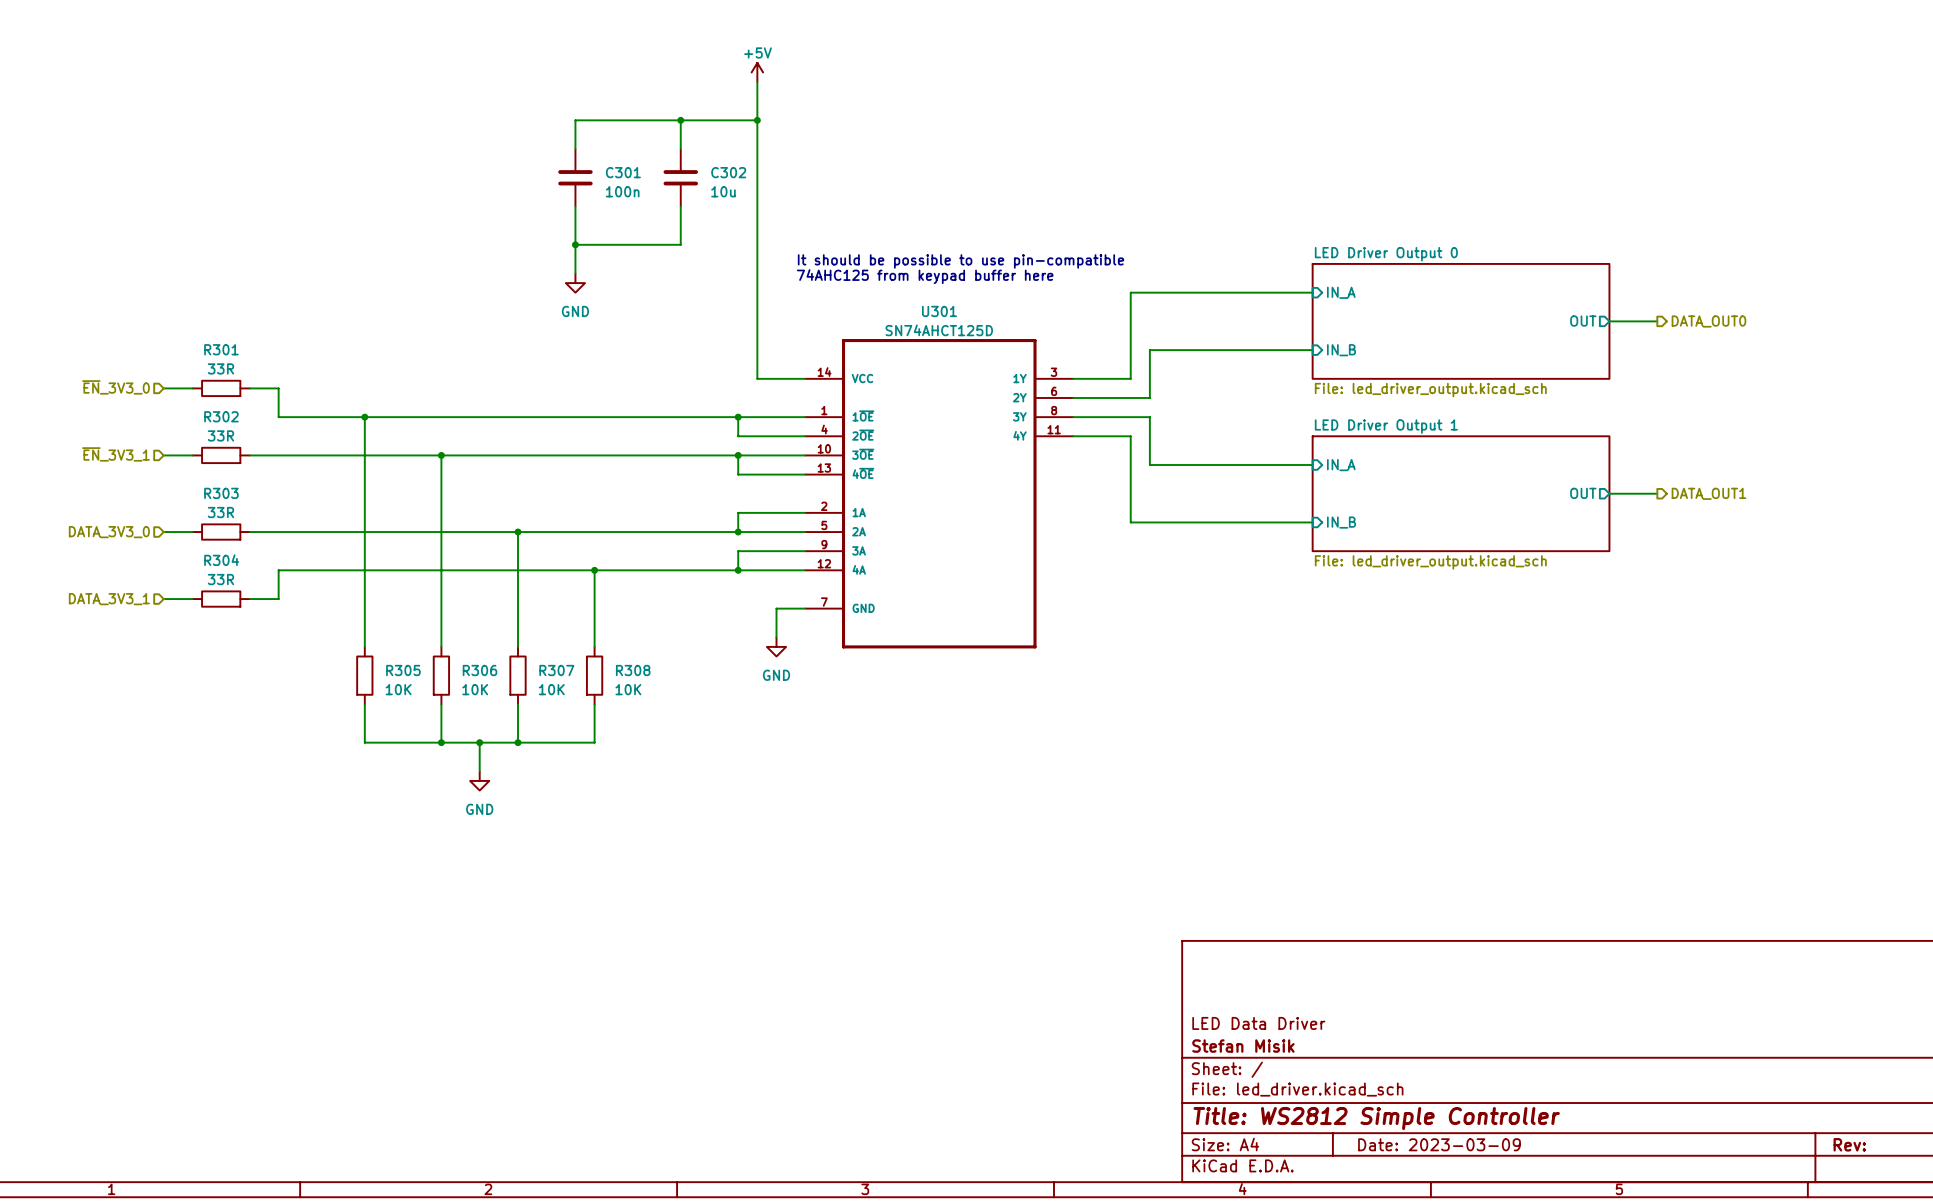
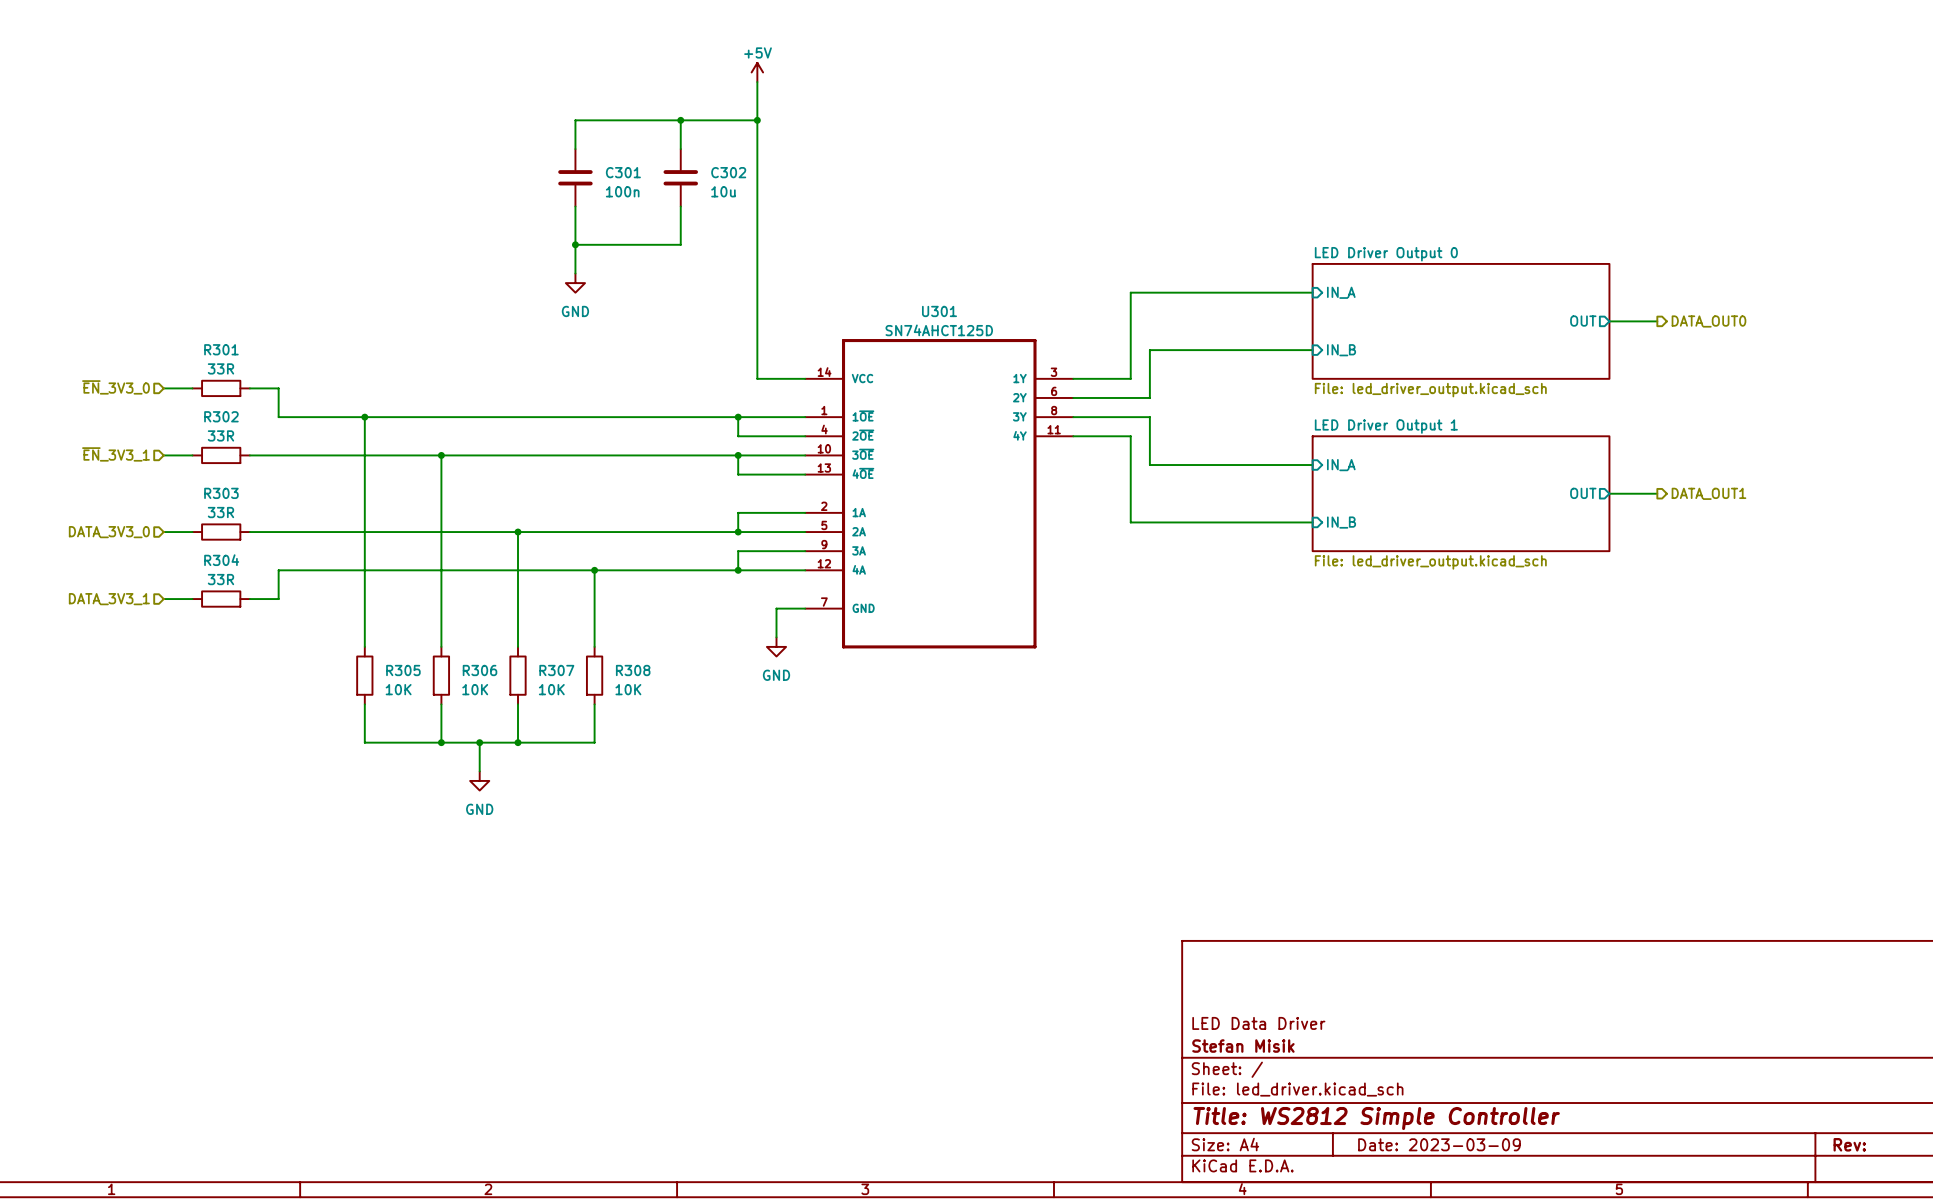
text: It should be possible to use pin-compatible (960, 261) -> none
text: 74AHC125 from keypad buffer here (925, 276) -> none

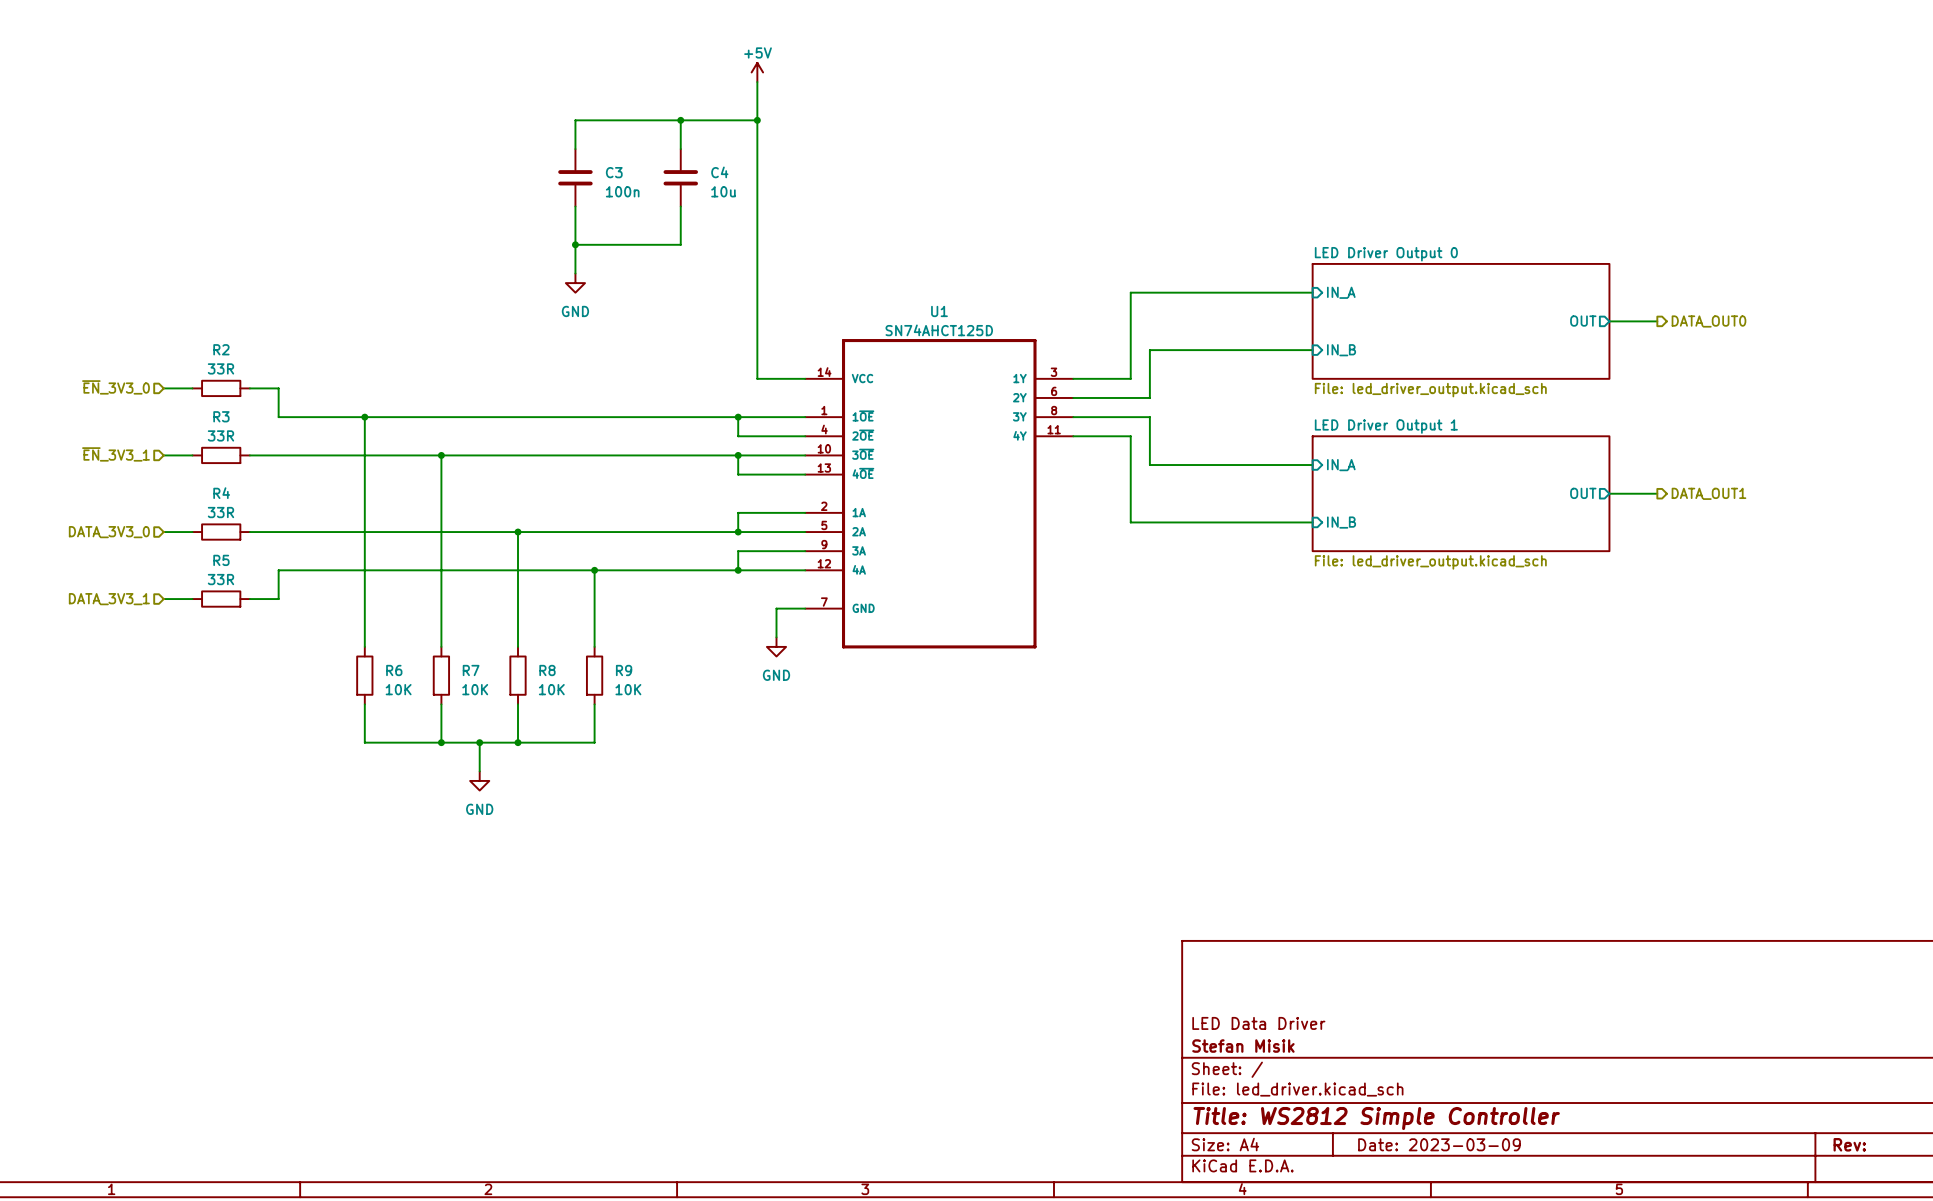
C301 name: C301 (623, 172) -> C3 (614, 172)
C302 name: C302 (728, 172) -> C4 (719, 172)
U301 name: U301 (939, 311) -> U1 (939, 311)
R301 name: R301 (221, 349) -> R2 (221, 349)
R302 name: R302 (221, 416) -> R3 (221, 416)
R303 name: R303 (221, 493) -> R4 (221, 493)
R304 name: R304 (221, 560) -> R5 (221, 560)
R305 name: R305 (403, 670) -> R6 (394, 670)
R306 name: R306 (480, 670) -> R7 (471, 670)
R307 name: R307 (556, 670) -> R8 (547, 670)
R308 name: R308 (633, 670) -> R9 (624, 670)

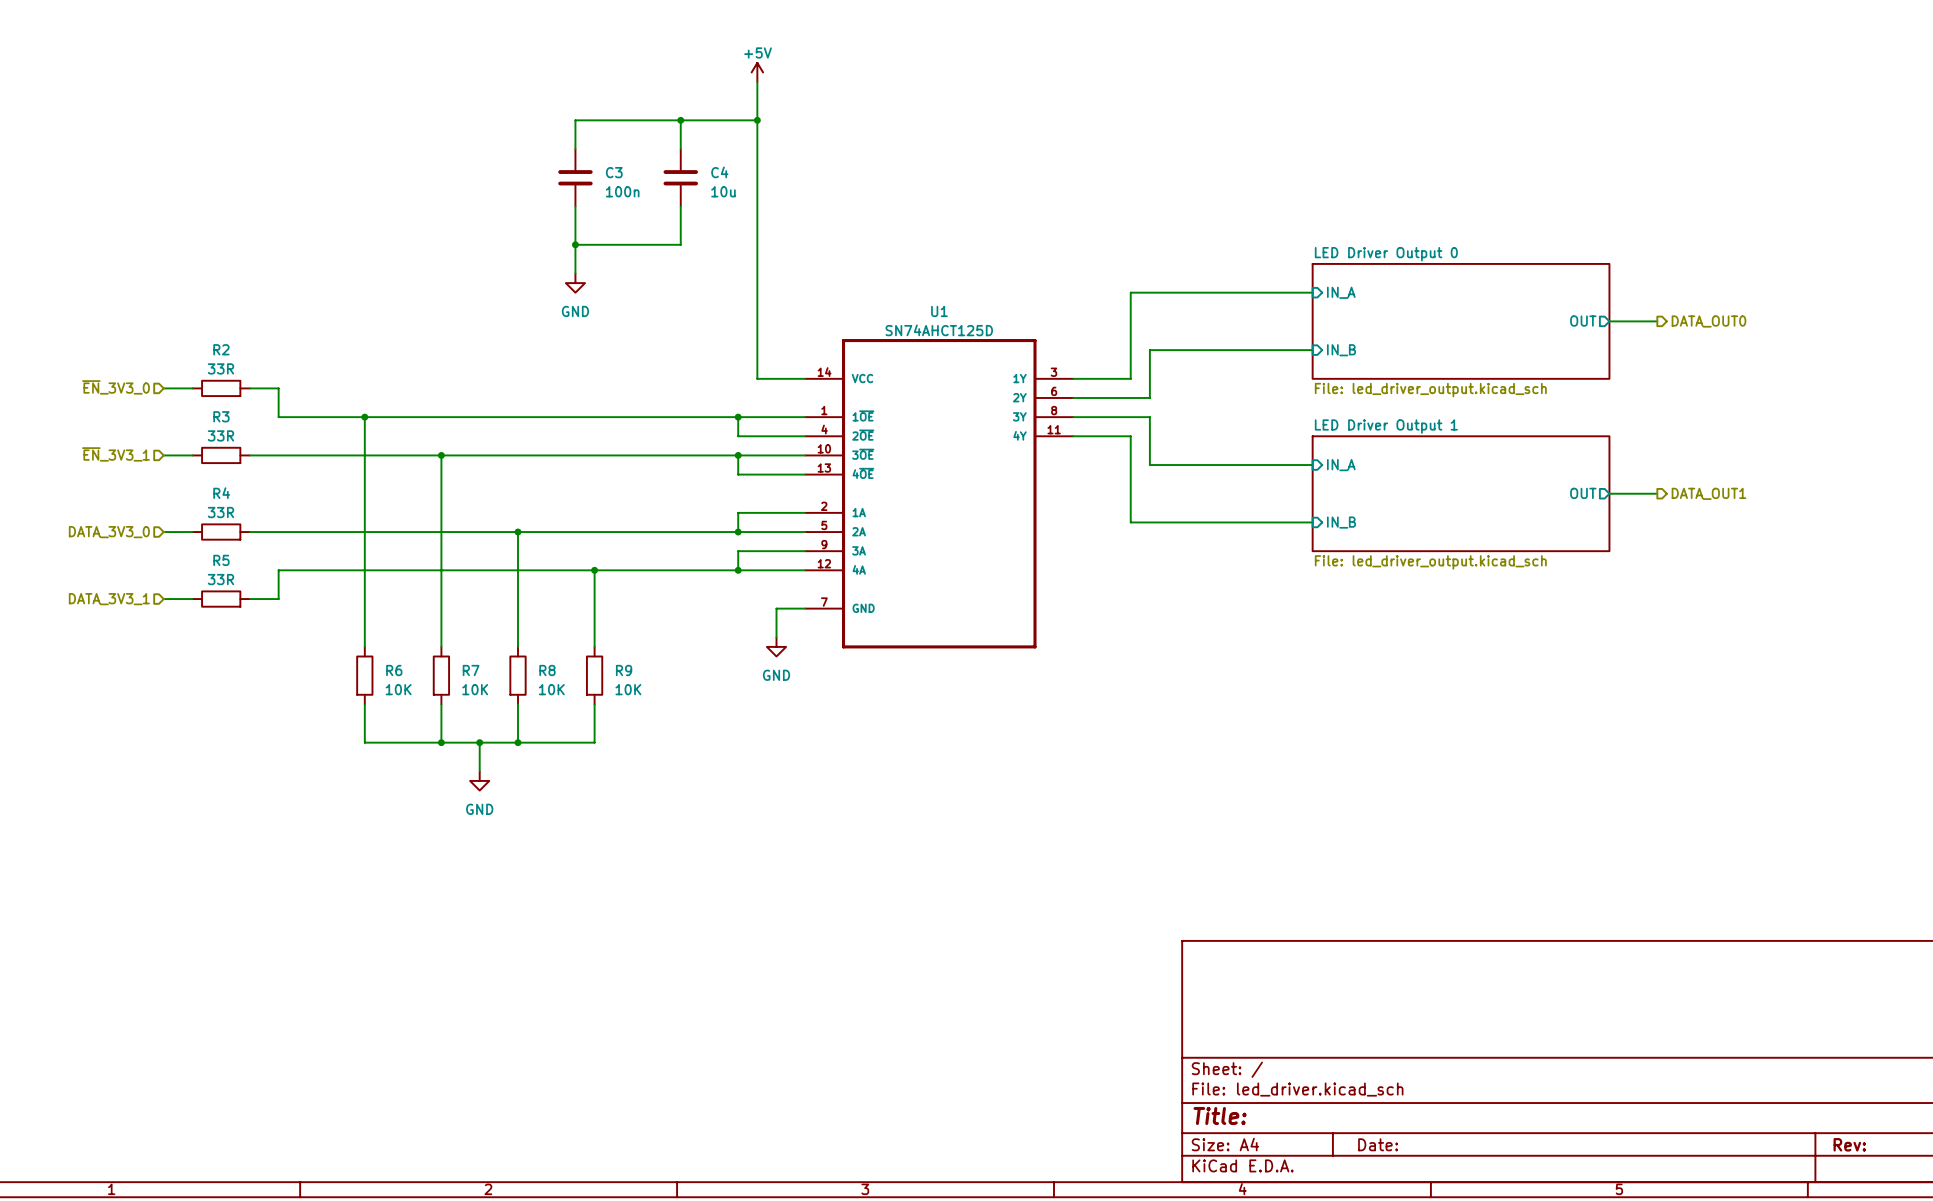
title block: LED Data Driver (1258, 1023) -> none
title block: Stefan Misik (1243, 1046) -> none
title block: Title: WS2812 Simple Controller (1376, 1118) -> Title: (1220, 1116)
title block: Date: 2023-03-09 (1439, 1144) -> Date: (1378, 1144)

